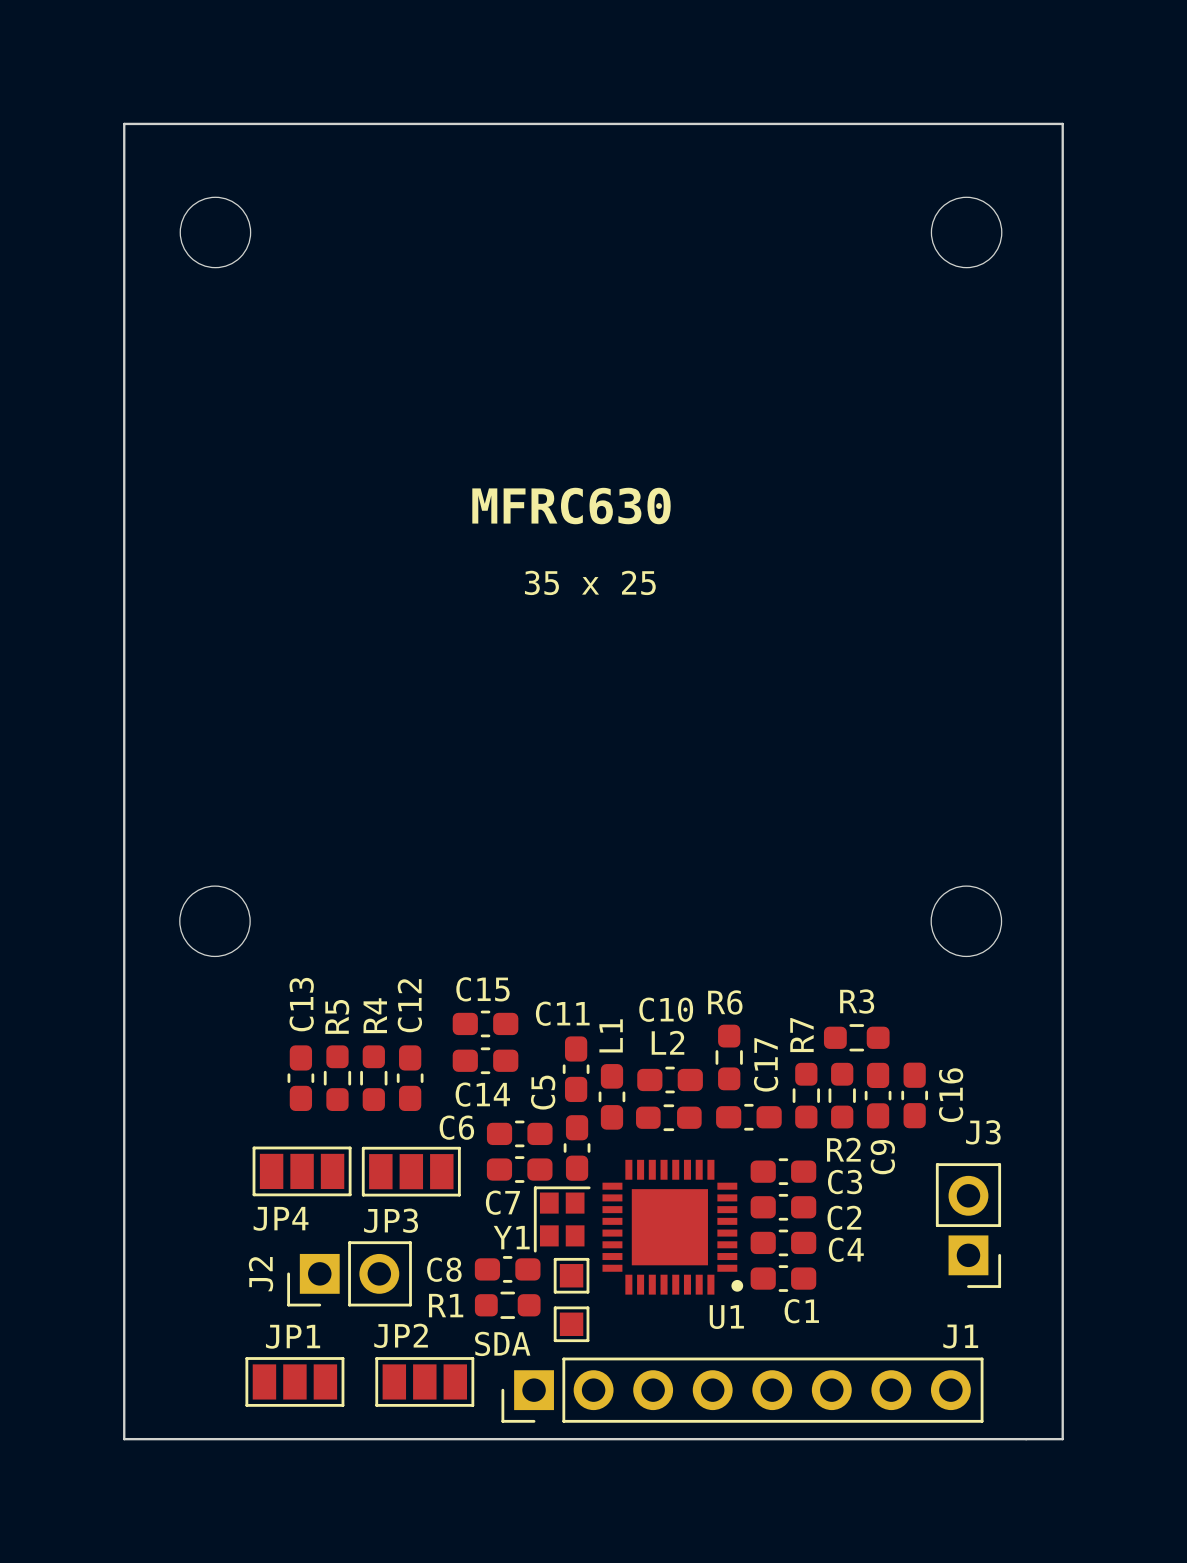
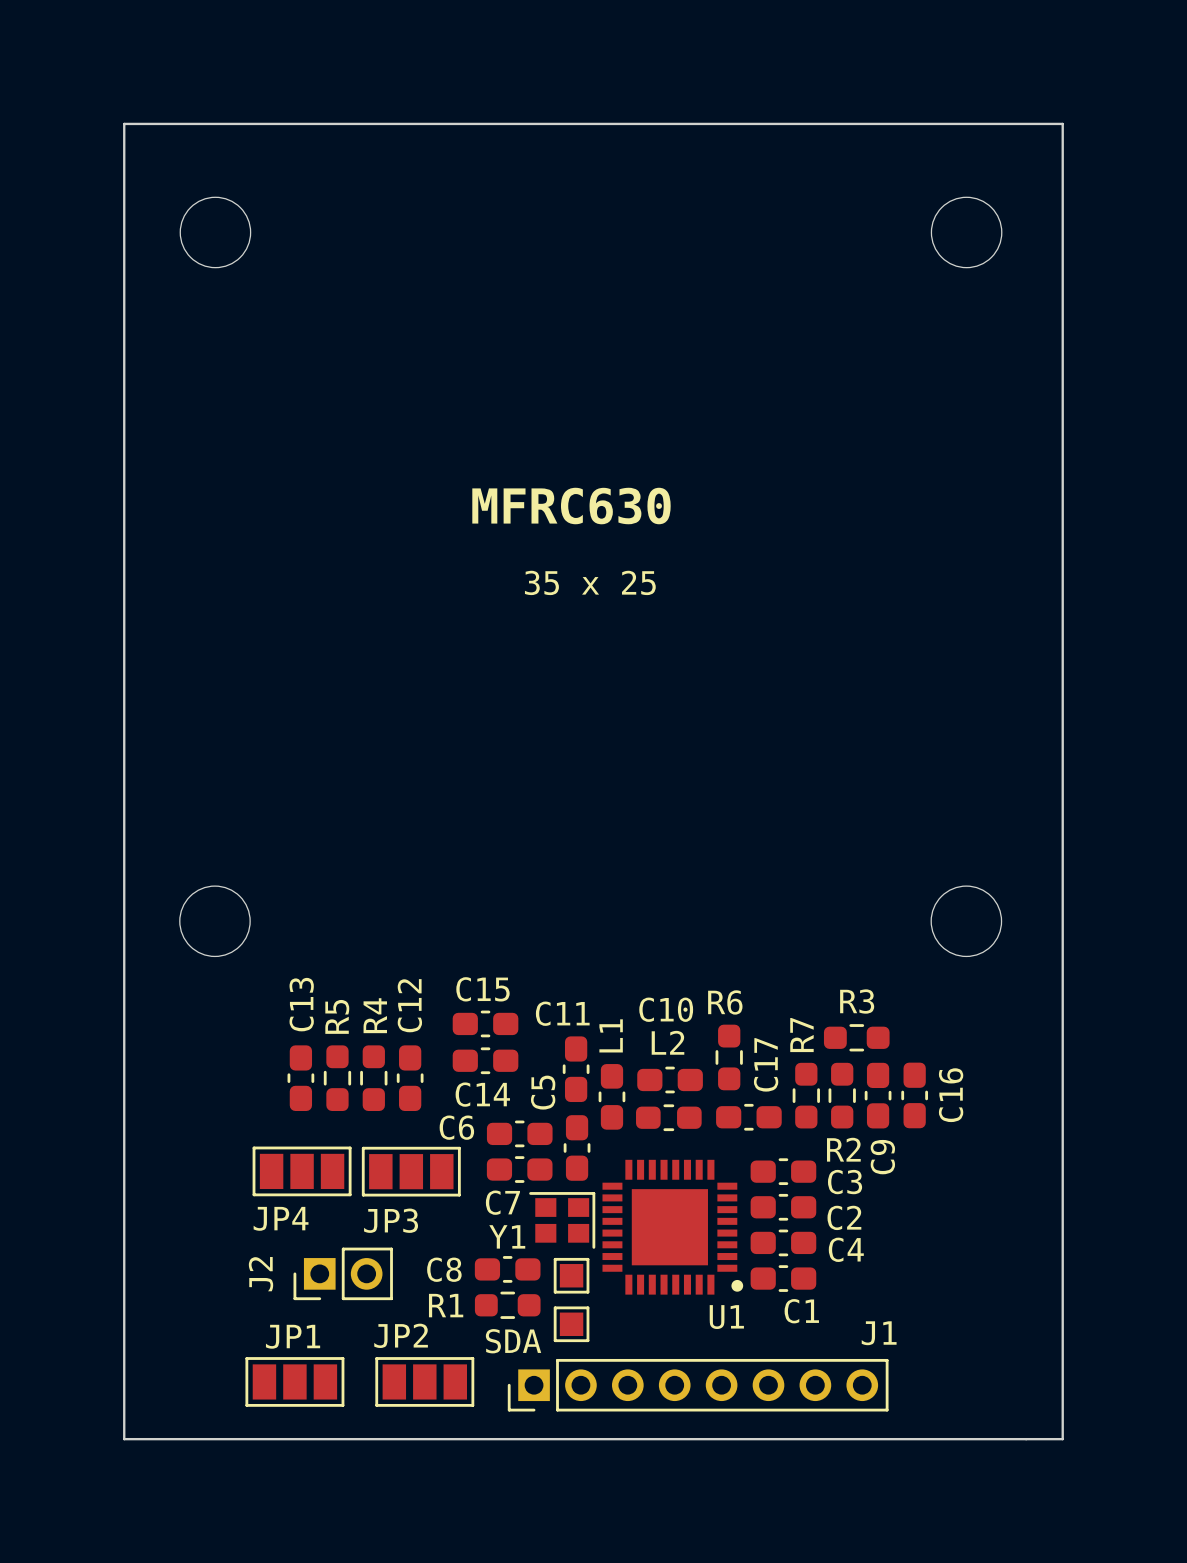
Y1 rotation: 0° (562, 1219) -> 90° clockwise (562, 1220)
J3: (968, 1225) -> none
J2 footprint: [287, 1241, 412, 1307] -> [293, 1247, 393, 1301]
SDA name: none -> SDA (513, 1341)
text: SDA (502, 1343) -> none
J1 footprint: [501, 1357, 984, 1423] -> [507, 1358, 889, 1412]

